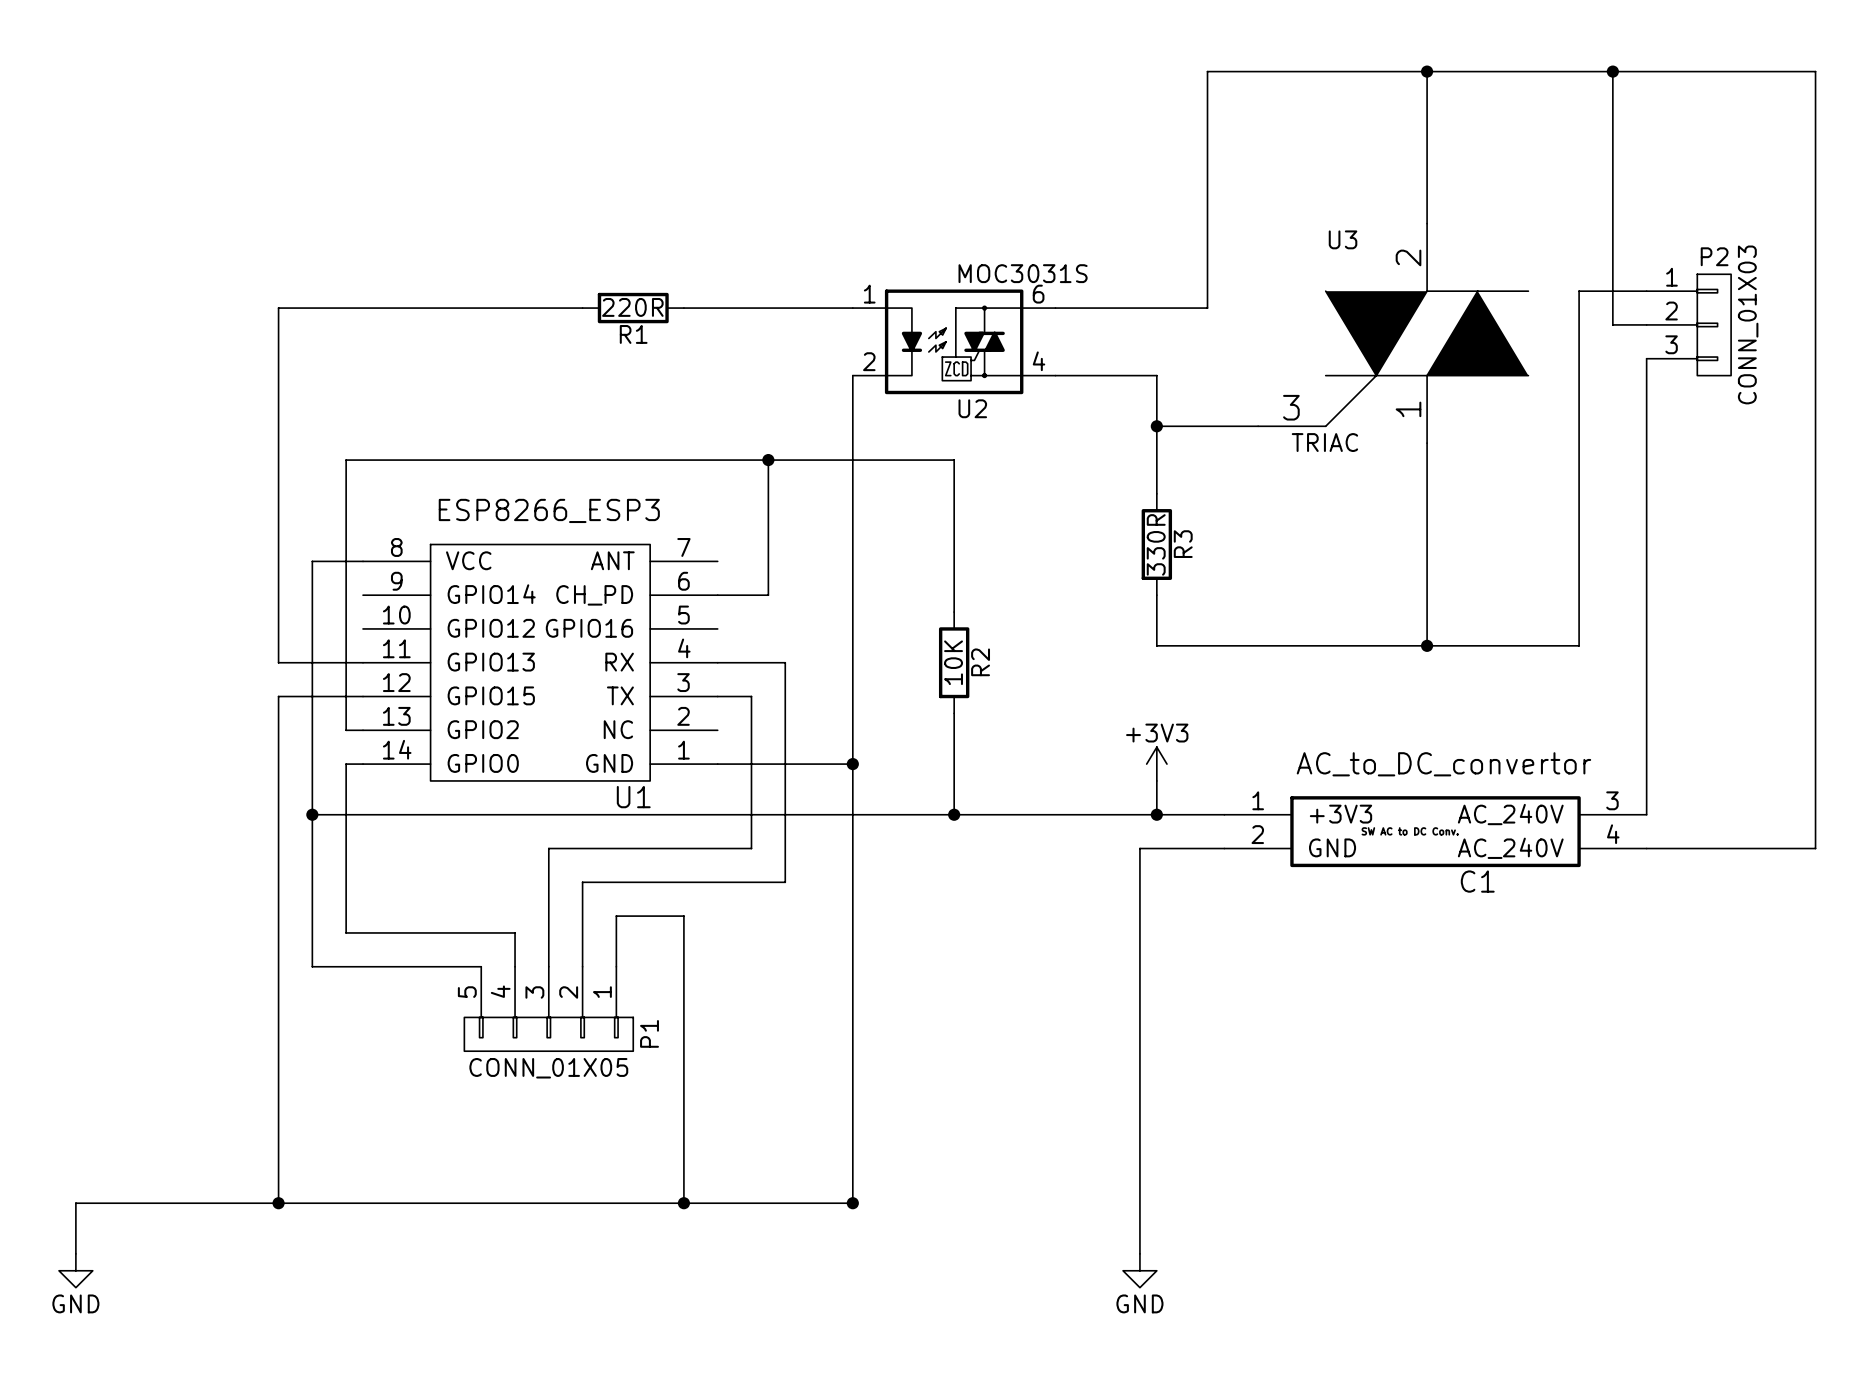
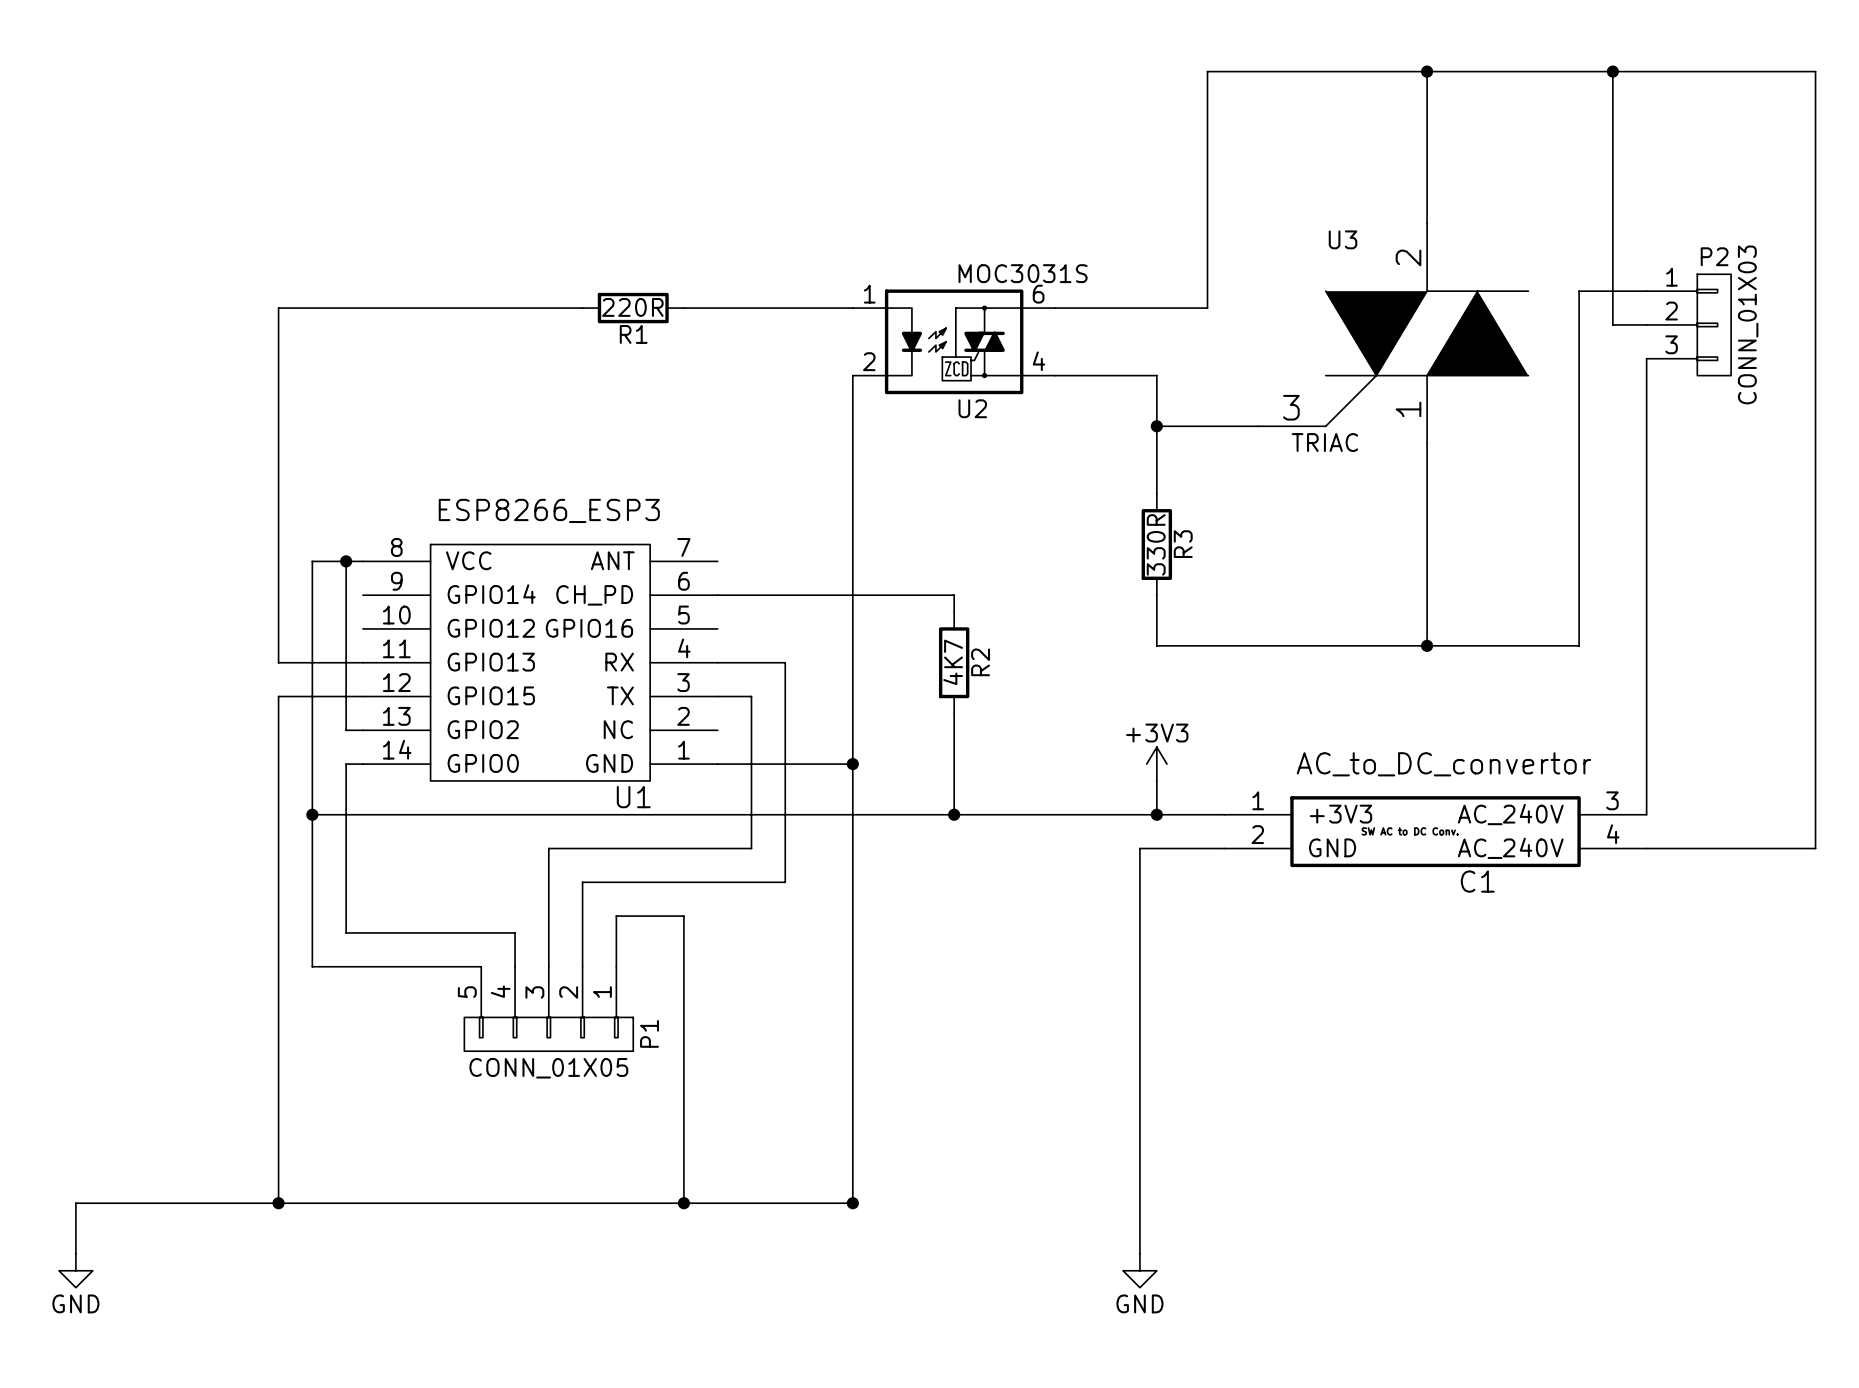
wire: (768, 460) (768, 595) -> (954, 595) (768, 595)
junction: (768, 460) -> none
wire: (346, 561) (346, 460) (954, 460) (954, 595) -> none
junction: none -> (346, 561)
R2 value: 10K (953, 662) -> 4K7 (953, 662)

